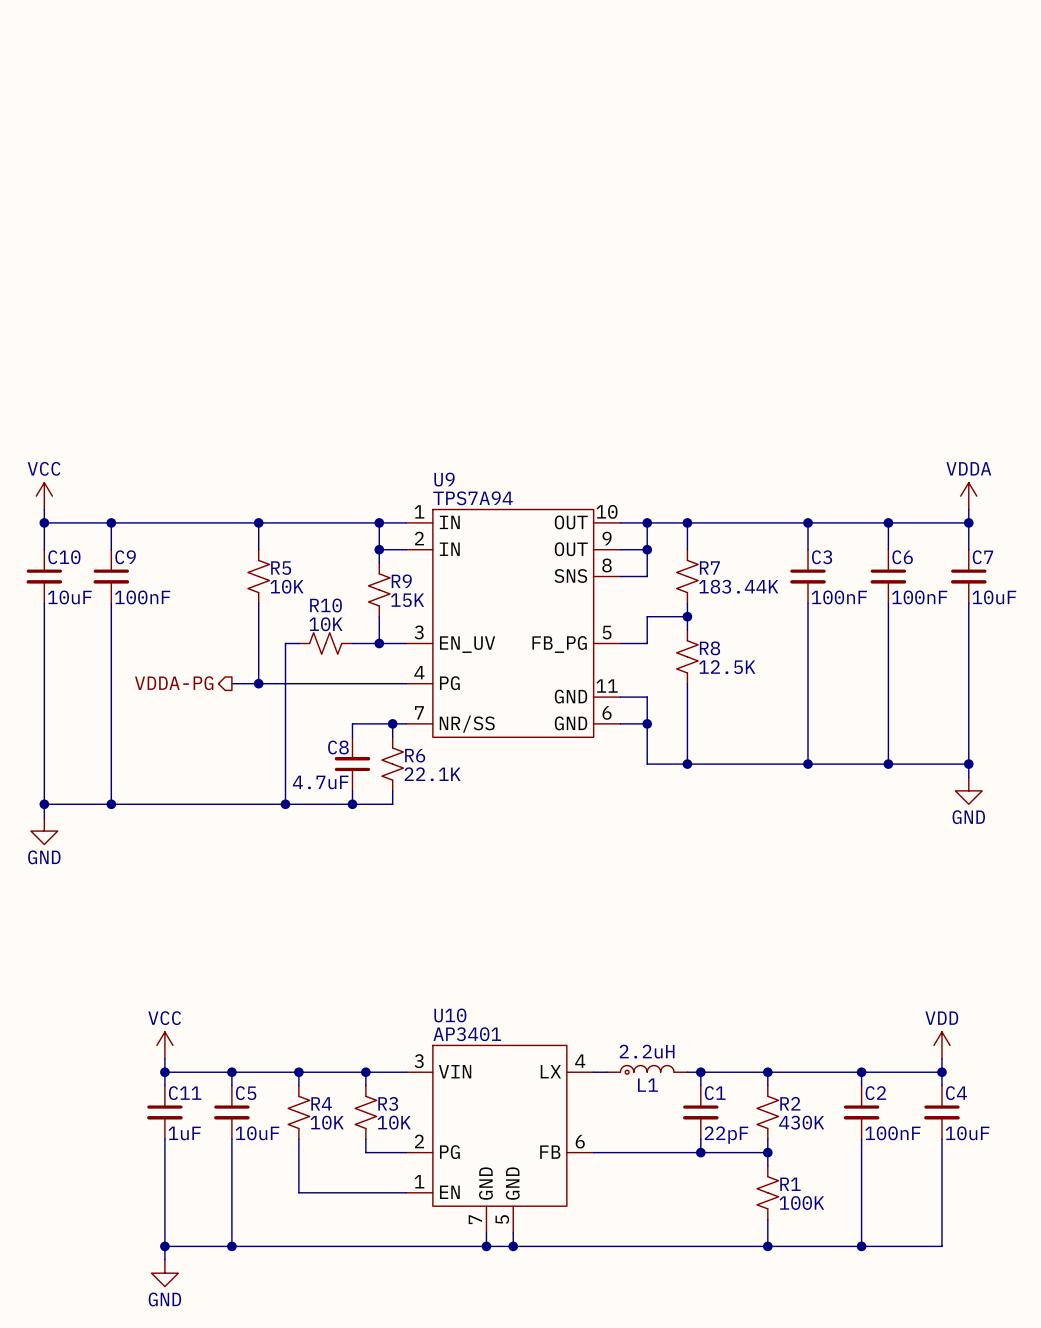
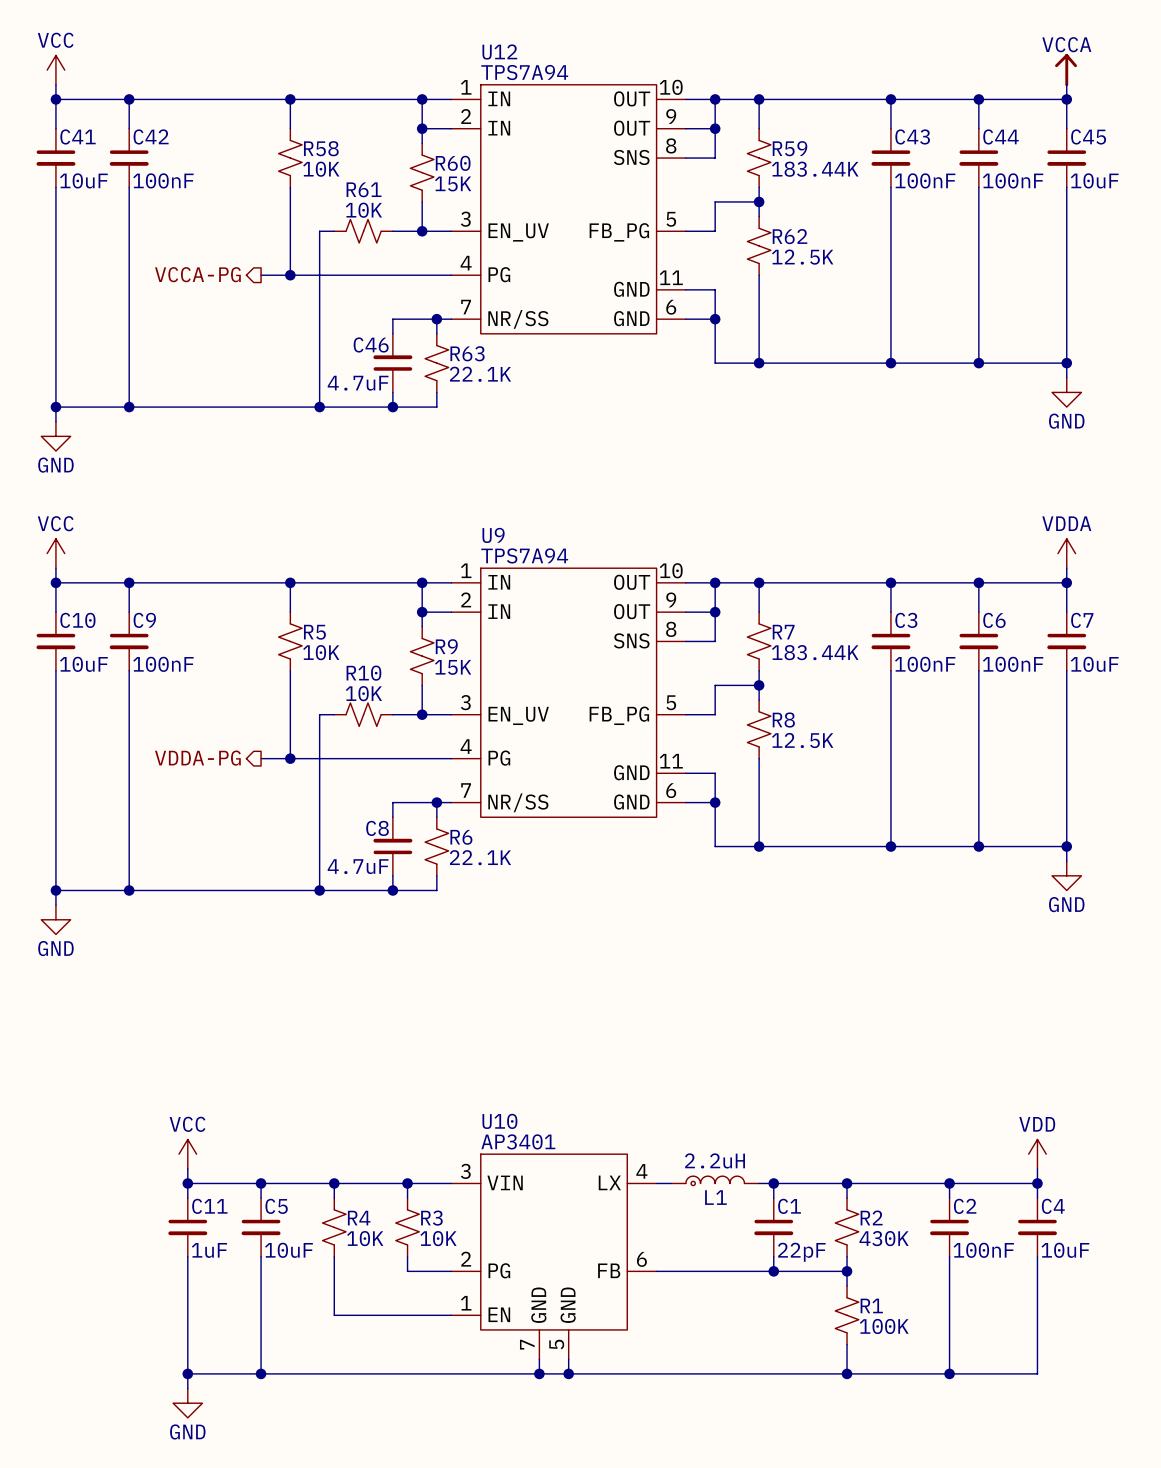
power symbol: none -> VCC (55, 70)
power symbol: none -> VCCA (1066, 70)
wire: none -> (55, 84) (55, 128)
wire: none -> (1066, 84) (1066, 128)
wire: none -> (55, 99) (451, 99)
junction: none -> (55, 99)
wire: none -> (129, 99) (129, 128)
junction: none -> (129, 99)
wire: none -> (290, 99) (290, 128)
junction: none -> (290, 99)
wire: none -> (422, 99) (422, 143)
junction: none -> (422, 99)
wire: none -> (685, 99) (1066, 99)
wire: none -> (715, 99) (715, 158) (685, 158)
junction: none -> (715, 99)
wire: none -> (759, 99) (759, 128)
junction: none -> (759, 99)
wire: none -> (890, 99) (890, 128)
junction: none -> (890, 99)
wire: none -> (978, 99) (978, 128)
junction: none -> (978, 99)
junction: none -> (1066, 99)
wire: none -> (422, 128) (451, 128)
junction: none -> (422, 128)
wire: none -> (685, 128) (715, 128)
junction: none -> (715, 128)
C41: none -> 10uF (55, 158)
C42: none -> 100nF (129, 158)
R58: none -> 10K (290, 158)
R59: none -> 183.44K (759, 158)
C43: none -> 100nF (890, 158)
C44: none -> 100nF (978, 158)
C45: none -> 10uF (1066, 158)
R60: none -> 15K (422, 172)
wire: none -> (55, 187) (55, 421)
wire: none -> (129, 187) (129, 407)
wire: none -> (290, 187) (290, 275)
wire: none -> (759, 187) (759, 216)
wire: none -> (890, 187) (890, 363)
wire: none -> (978, 187) (978, 363)
wire: none -> (1066, 187) (1066, 377)
wire: none -> (422, 201) (422, 231)
wire: none -> (759, 201) (715, 201) (715, 231) (685, 231)
junction: none -> (759, 201)
U12: none -> TPS7A94 (568, 209)
wire: none -> (334, 231) (319, 231) (319, 407)
R61: none -> 10K (363, 231)
wire: none -> (392, 231) (451, 231)
junction: none -> (422, 231)
R62: none -> 12.5K (759, 245)
hierarchical label: none -> VCCA-PG (197, 274)
wire: none -> (261, 275) (451, 275)
junction: none -> (290, 275)
wire: none -> (759, 275) (759, 363)
wire: none -> (685, 289) (715, 289) (715, 363) (1066, 363)
wire: none -> (436, 319) (436, 333)
junction: none -> (436, 319)
wire: none -> (451, 319) (392, 319) (392, 333)
wire: none -> (685, 319) (715, 319)
junction: none -> (715, 319)
C46: none -> 4.7uF (392, 363)
R63: none -> 22.1K (436, 363)
junction: none -> (759, 363)
junction: none -> (890, 363)
junction: none -> (978, 363)
junction: none -> (1066, 363)
wire: none -> (392, 392) (392, 407)
wire: none -> (436, 392) (436, 407) (55, 407)
power symbol: none -> GND (1066, 392)
junction: none -> (55, 407)
junction: none -> (129, 407)
junction: none -> (319, 407)
junction: none -> (392, 407)
power symbol: none -> GND (55, 436)

